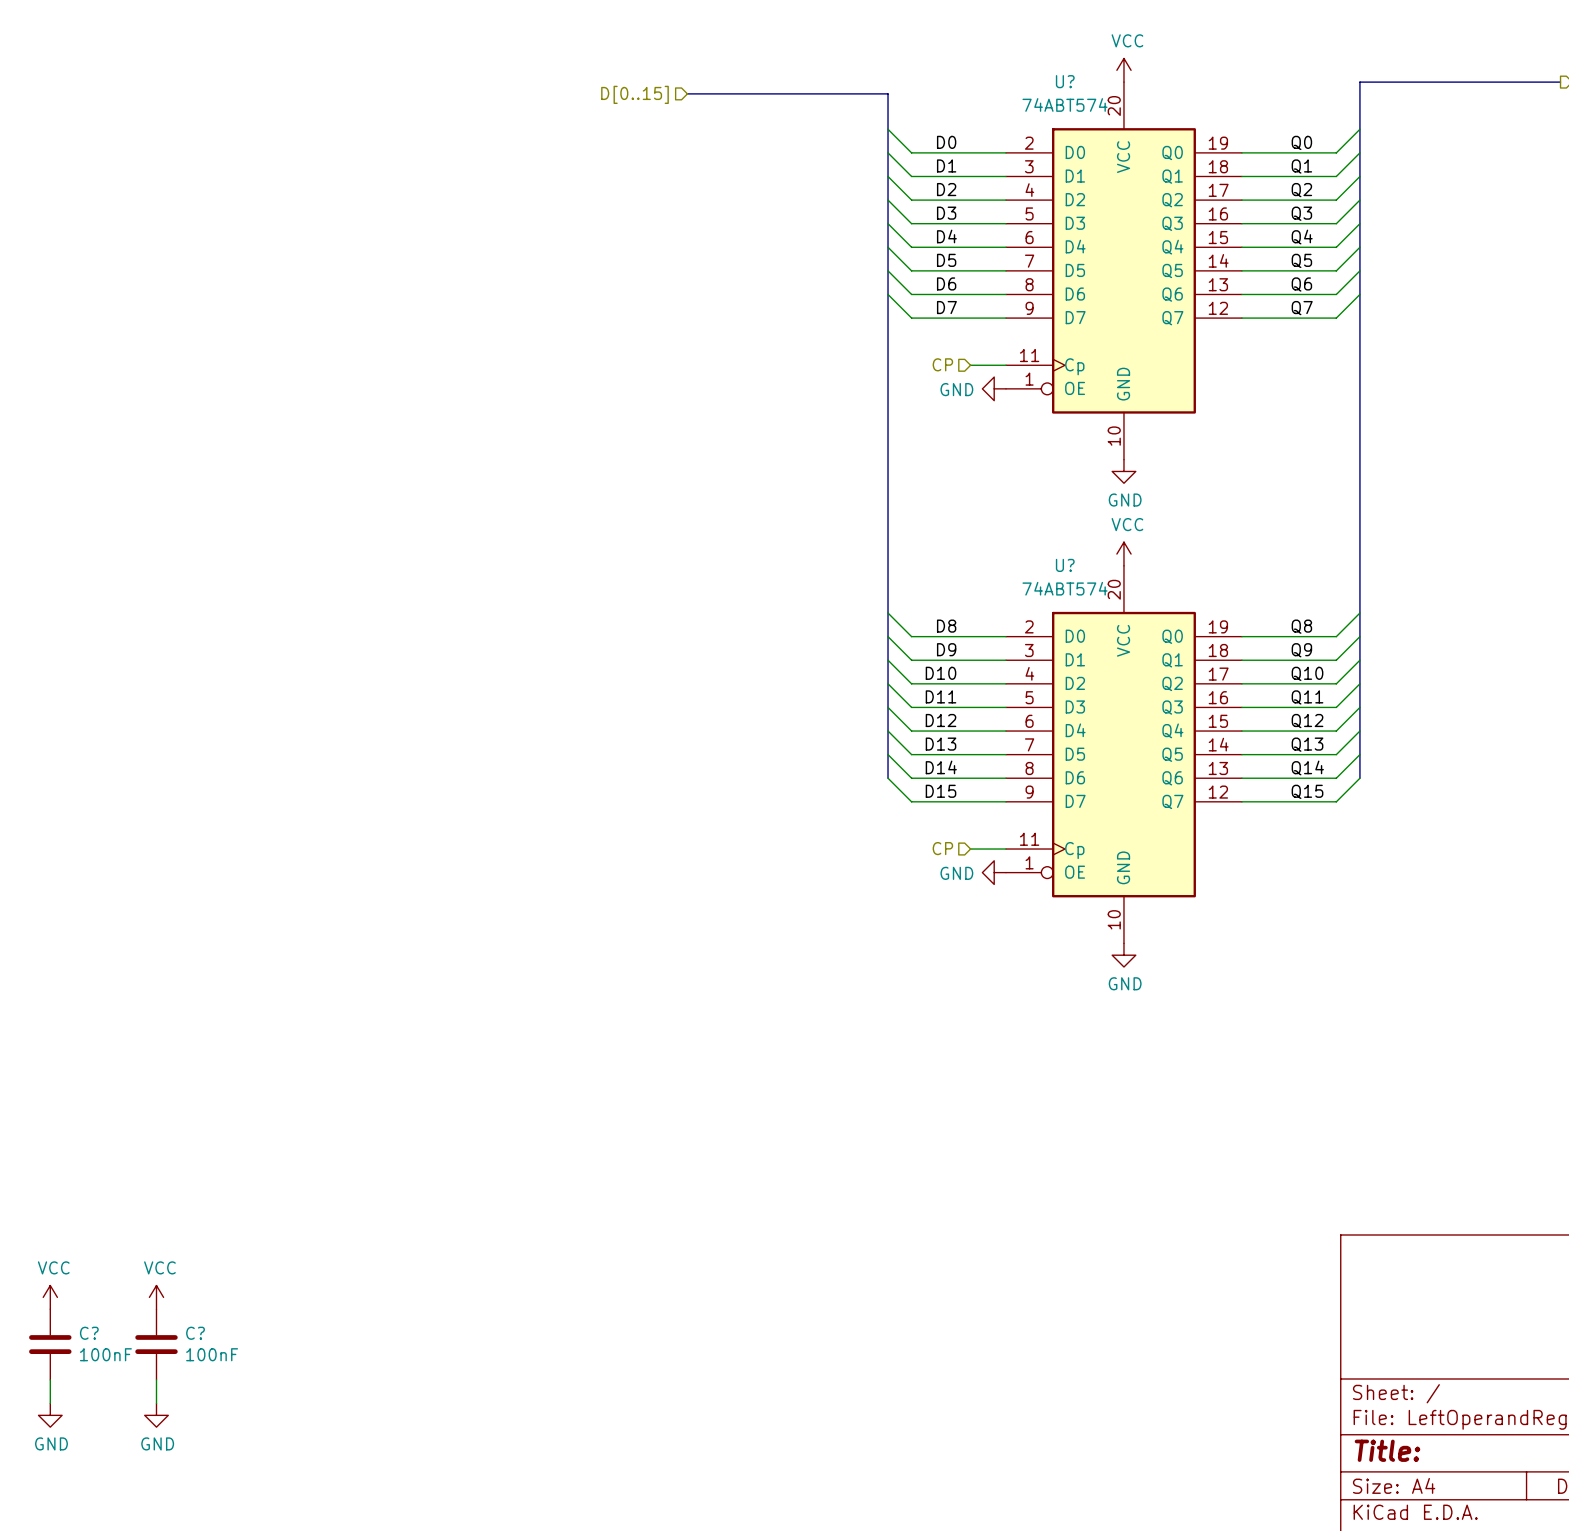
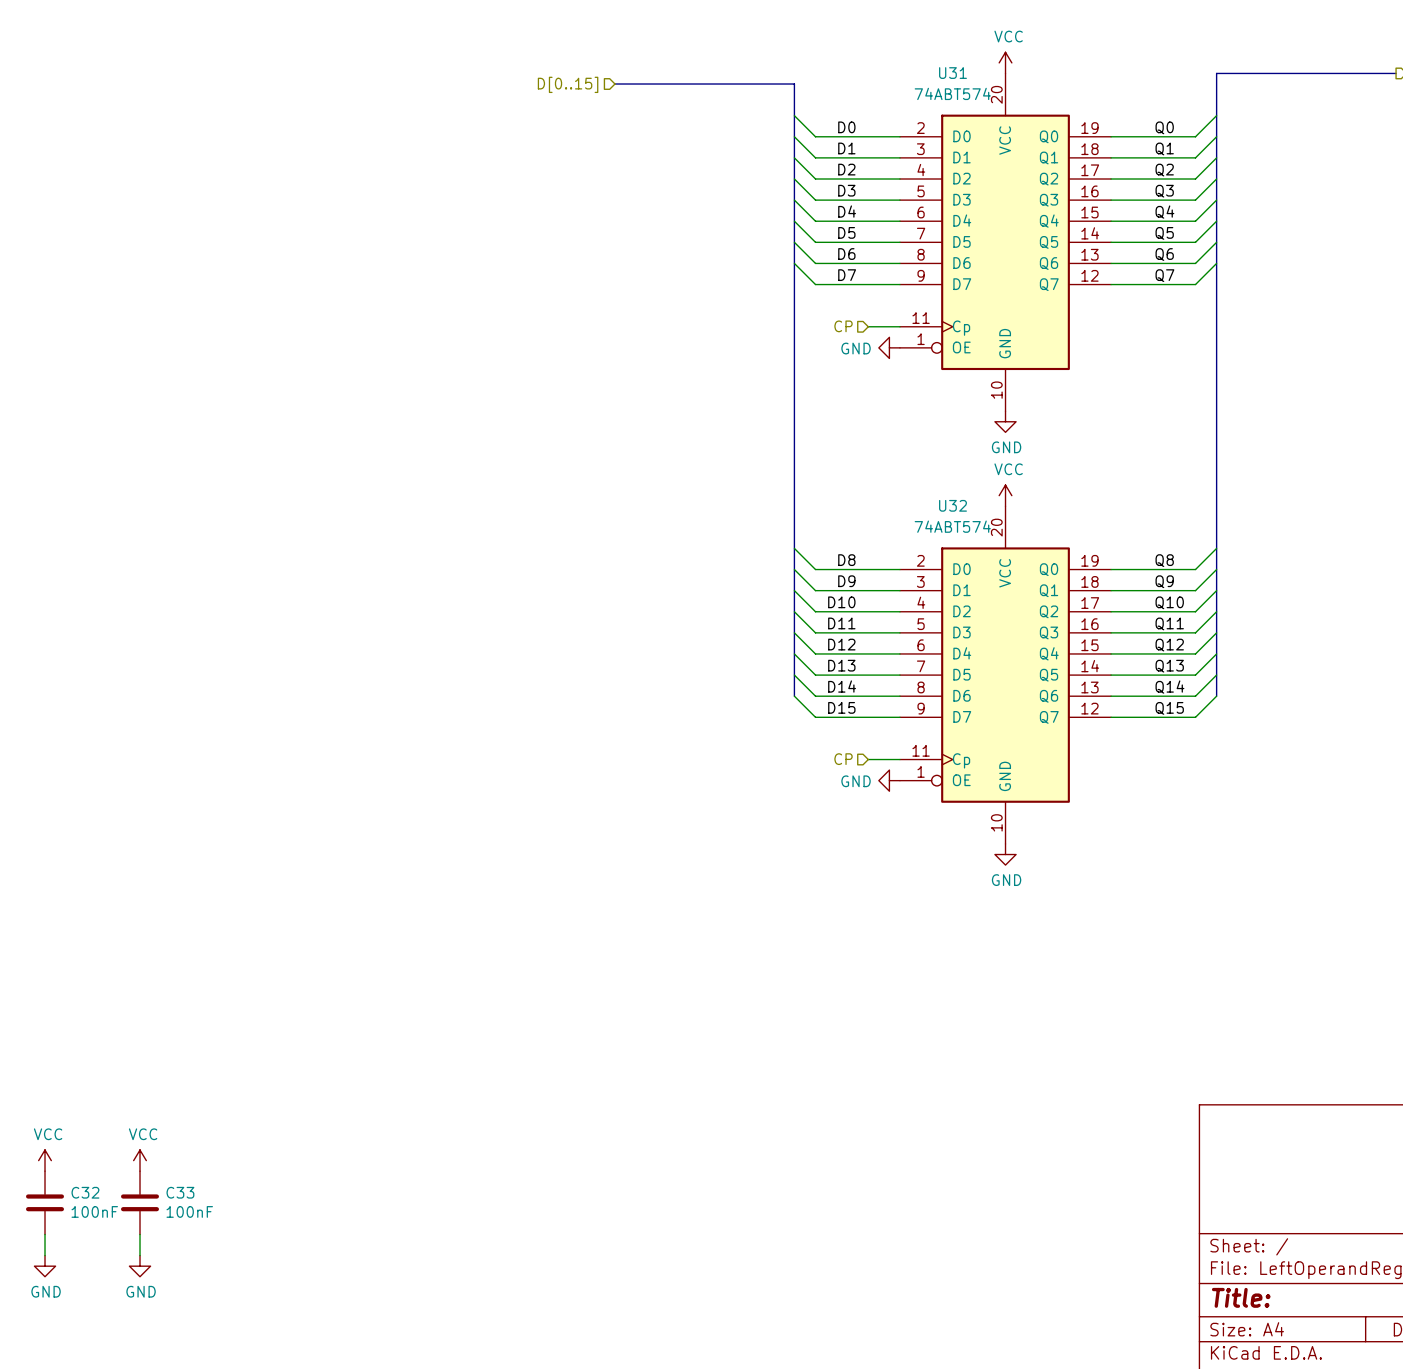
U? name: U? (1065, 81) -> U31 (952, 73)
U? name: U? (1065, 565) -> U32 (952, 505)
C? name: C? (89, 1333) -> C32 (85, 1192)
C? name: C? (195, 1333) -> C33 (180, 1192)

